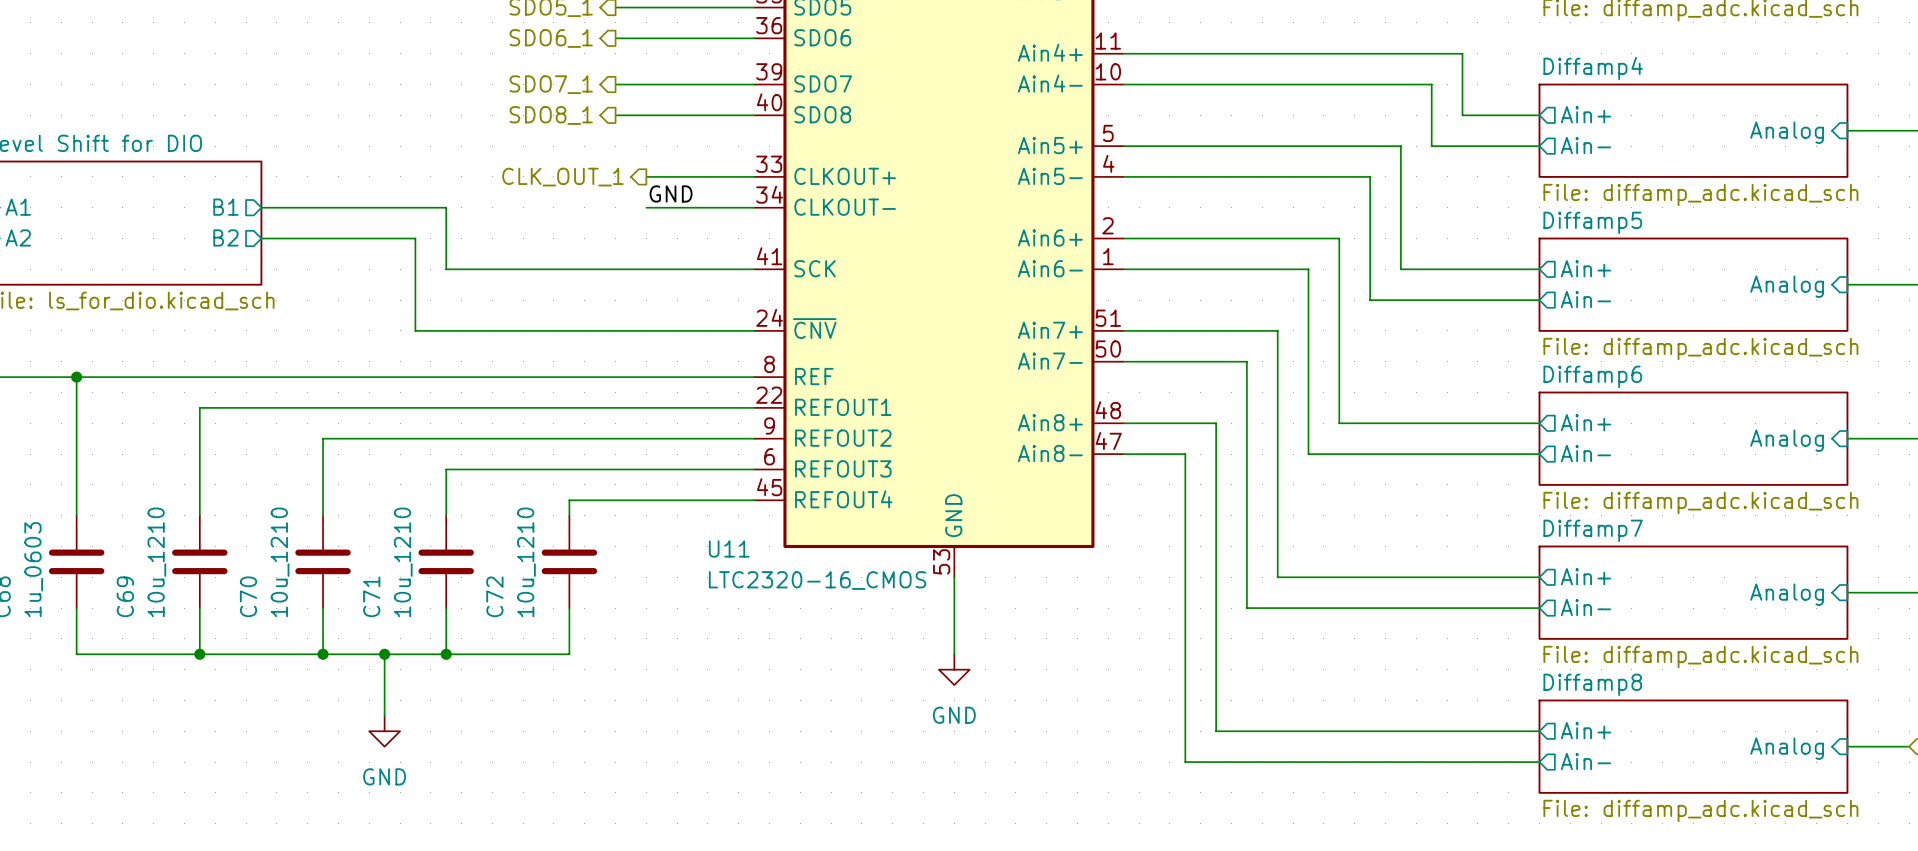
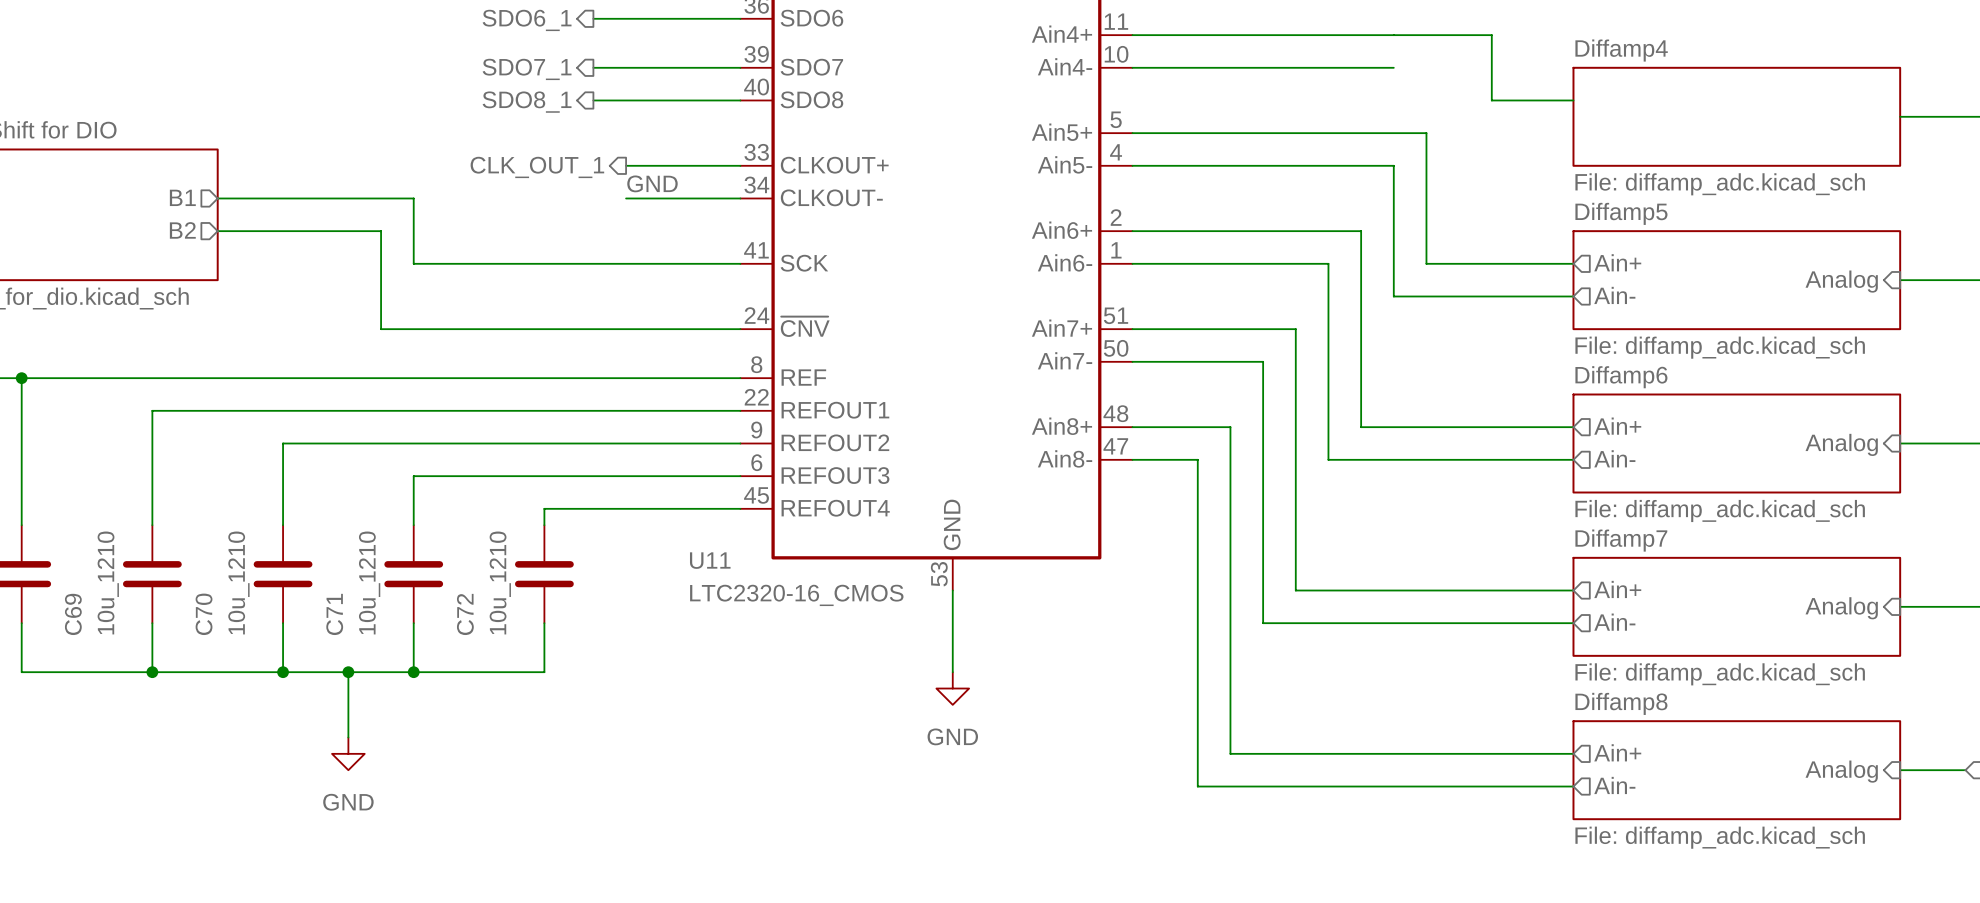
wire: (1370, 84) (1431, 84) (1431, 146) (1539, 146) -> none
sheet pin: Ain+ (1585, 114) -> none
sheet pin: Analog (1787, 132) -> none
sheet pin: Ain- (1585, 145) -> none

